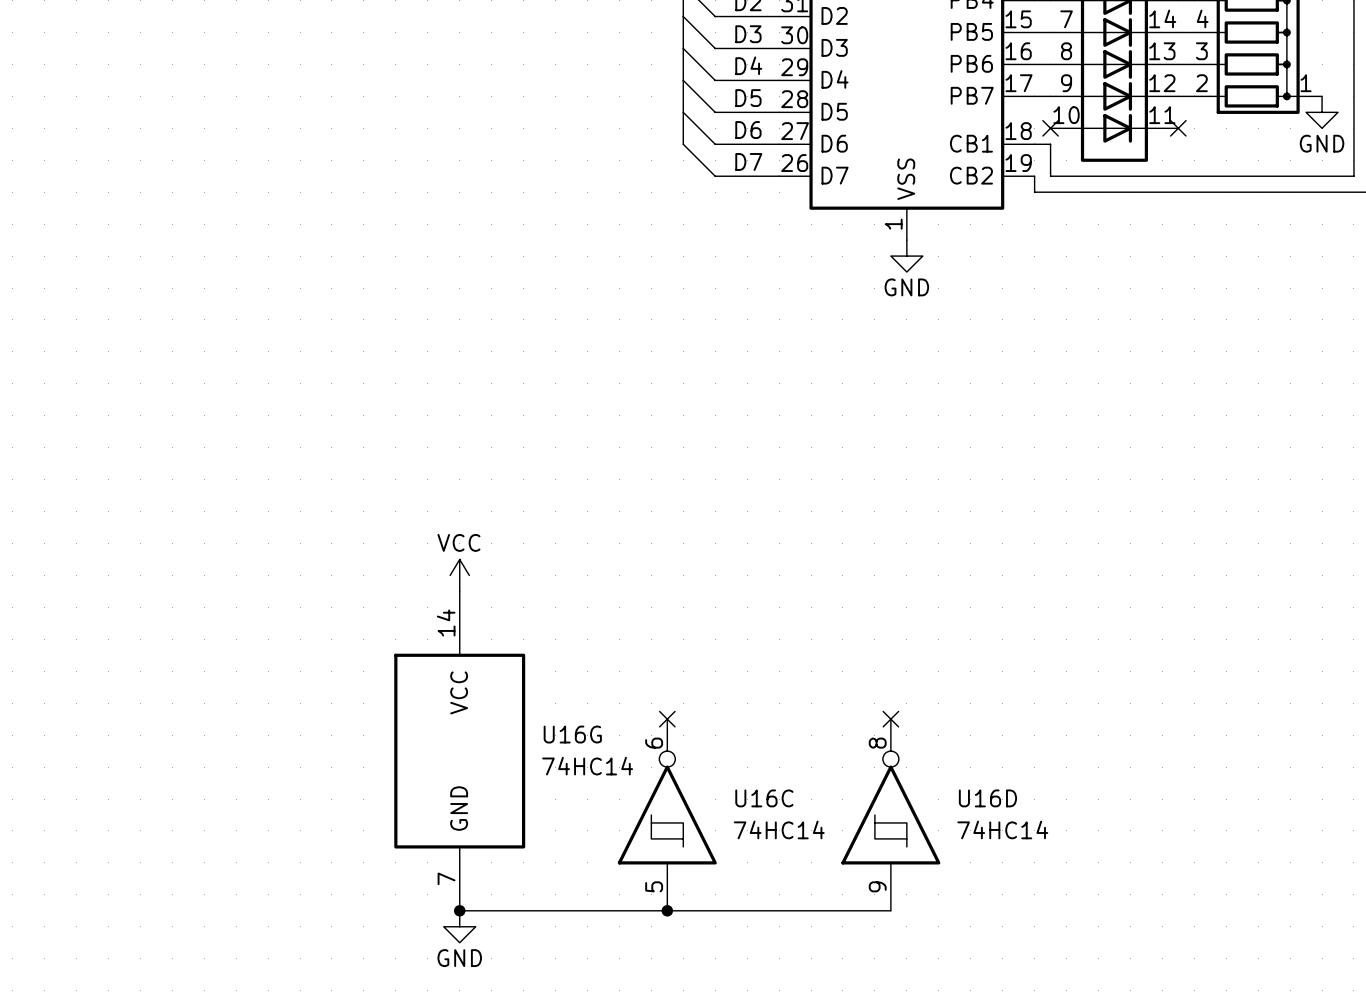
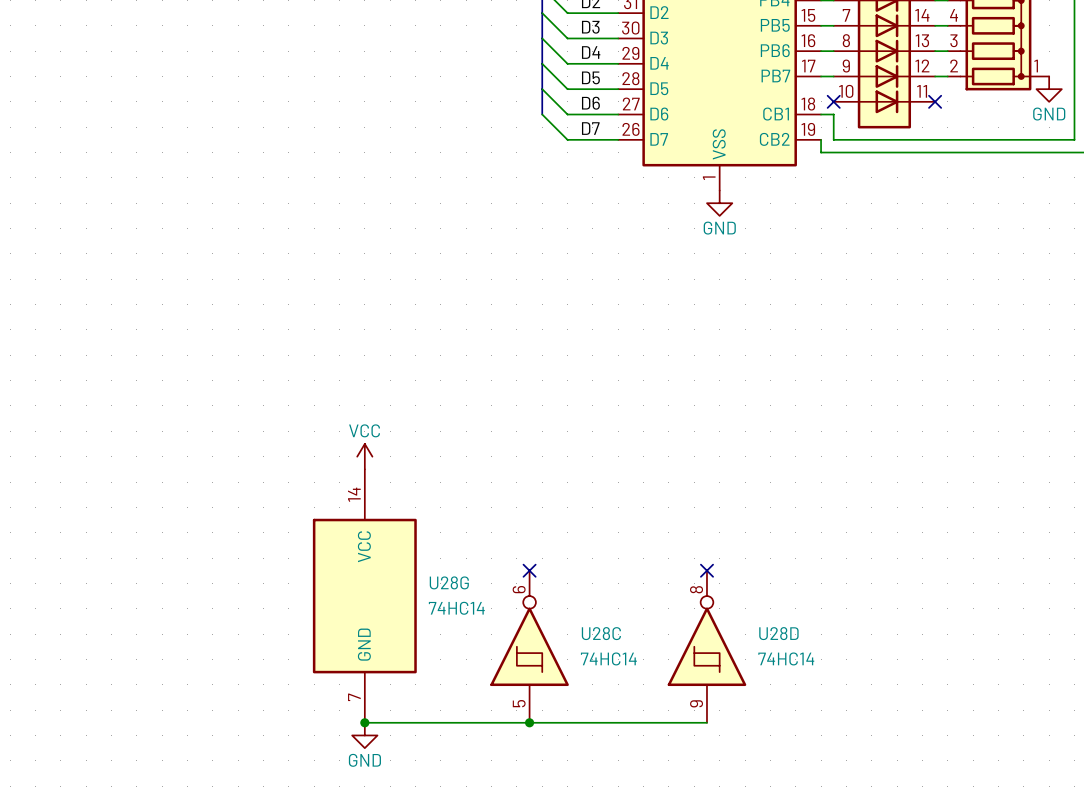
U16G name: U16G (572, 734) -> U28G (449, 582)
U16C name: U16C (764, 798) -> U28C (601, 633)
U16D name: U16D (987, 798) -> U28D (778, 633)

